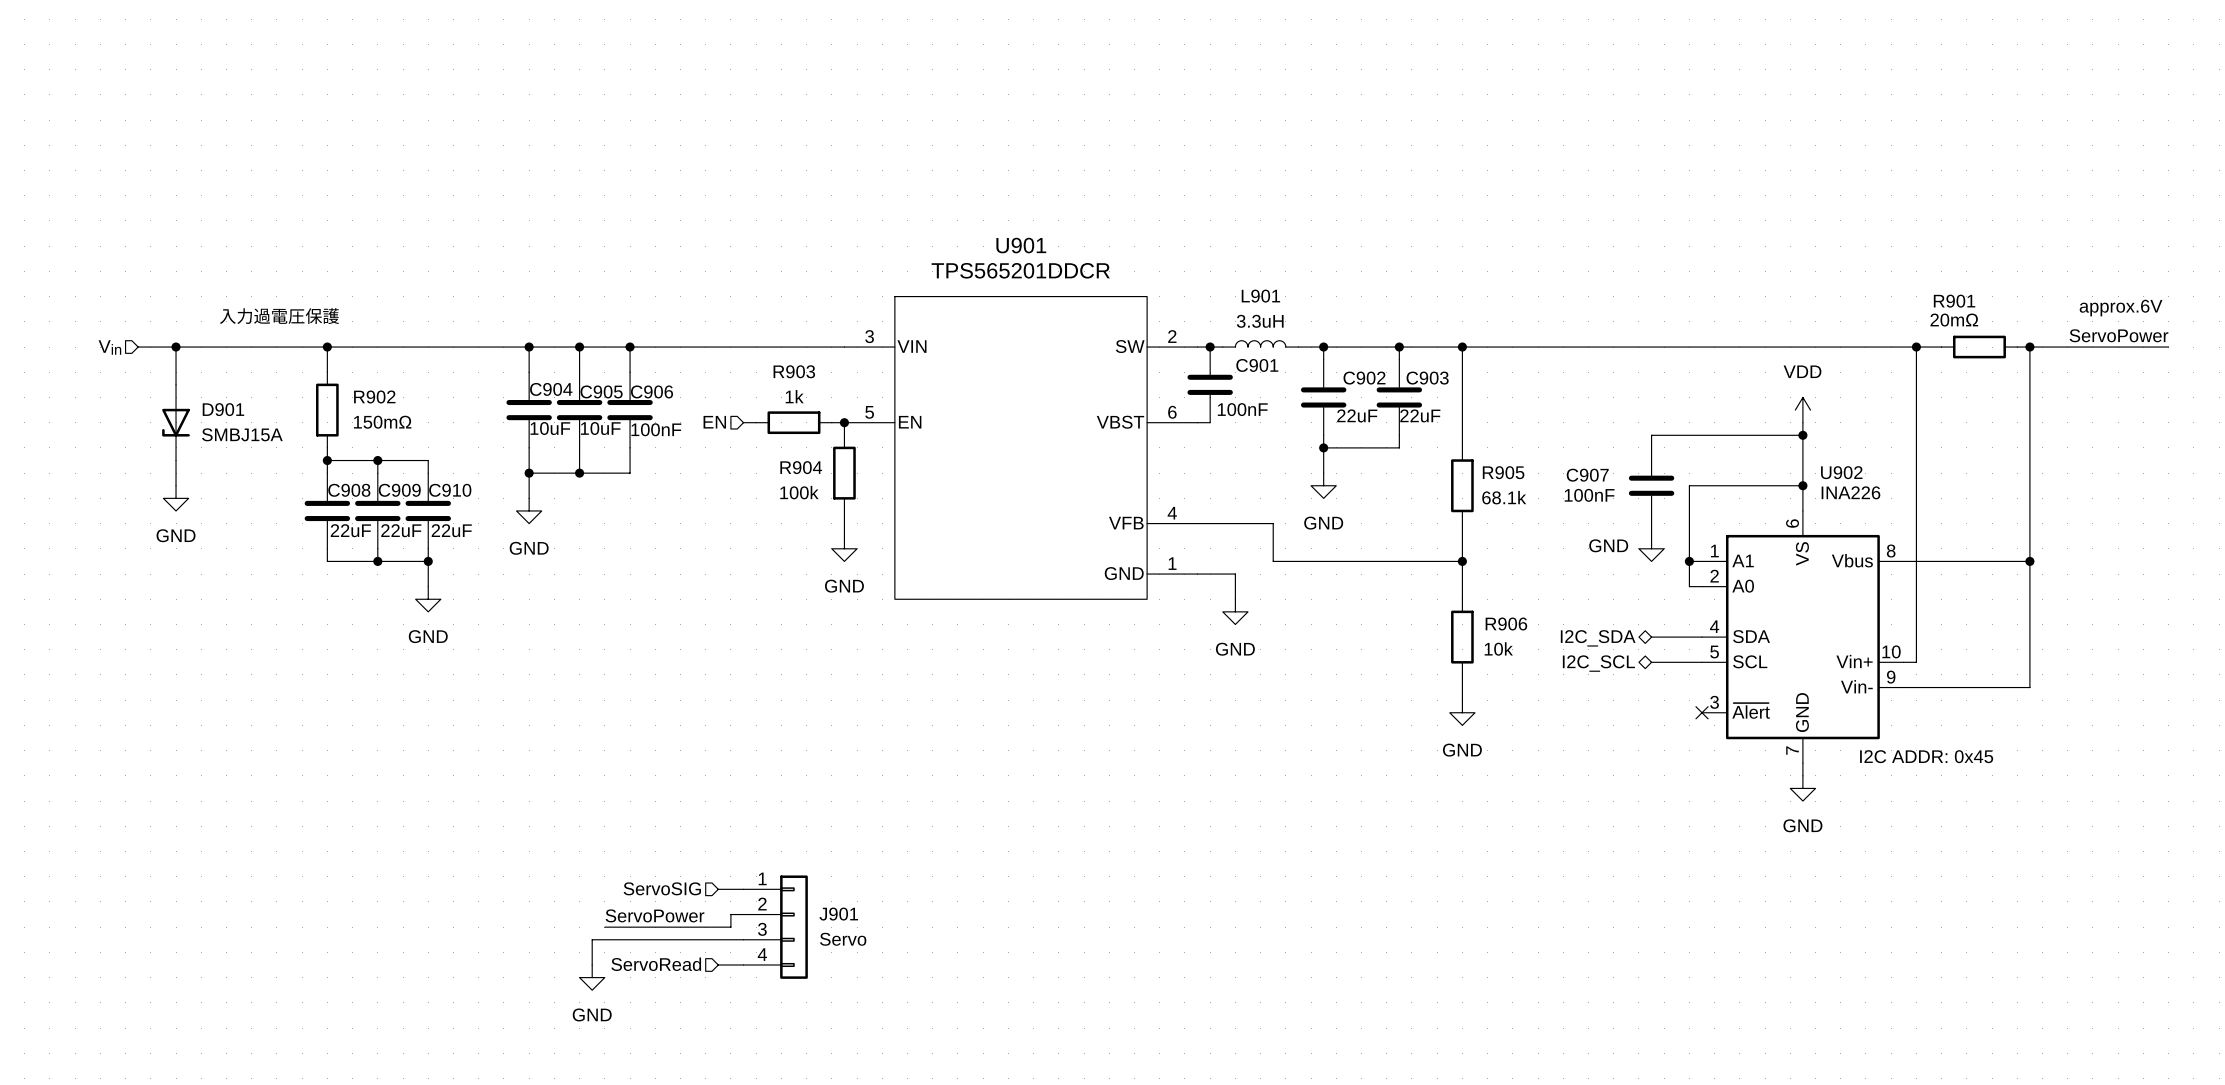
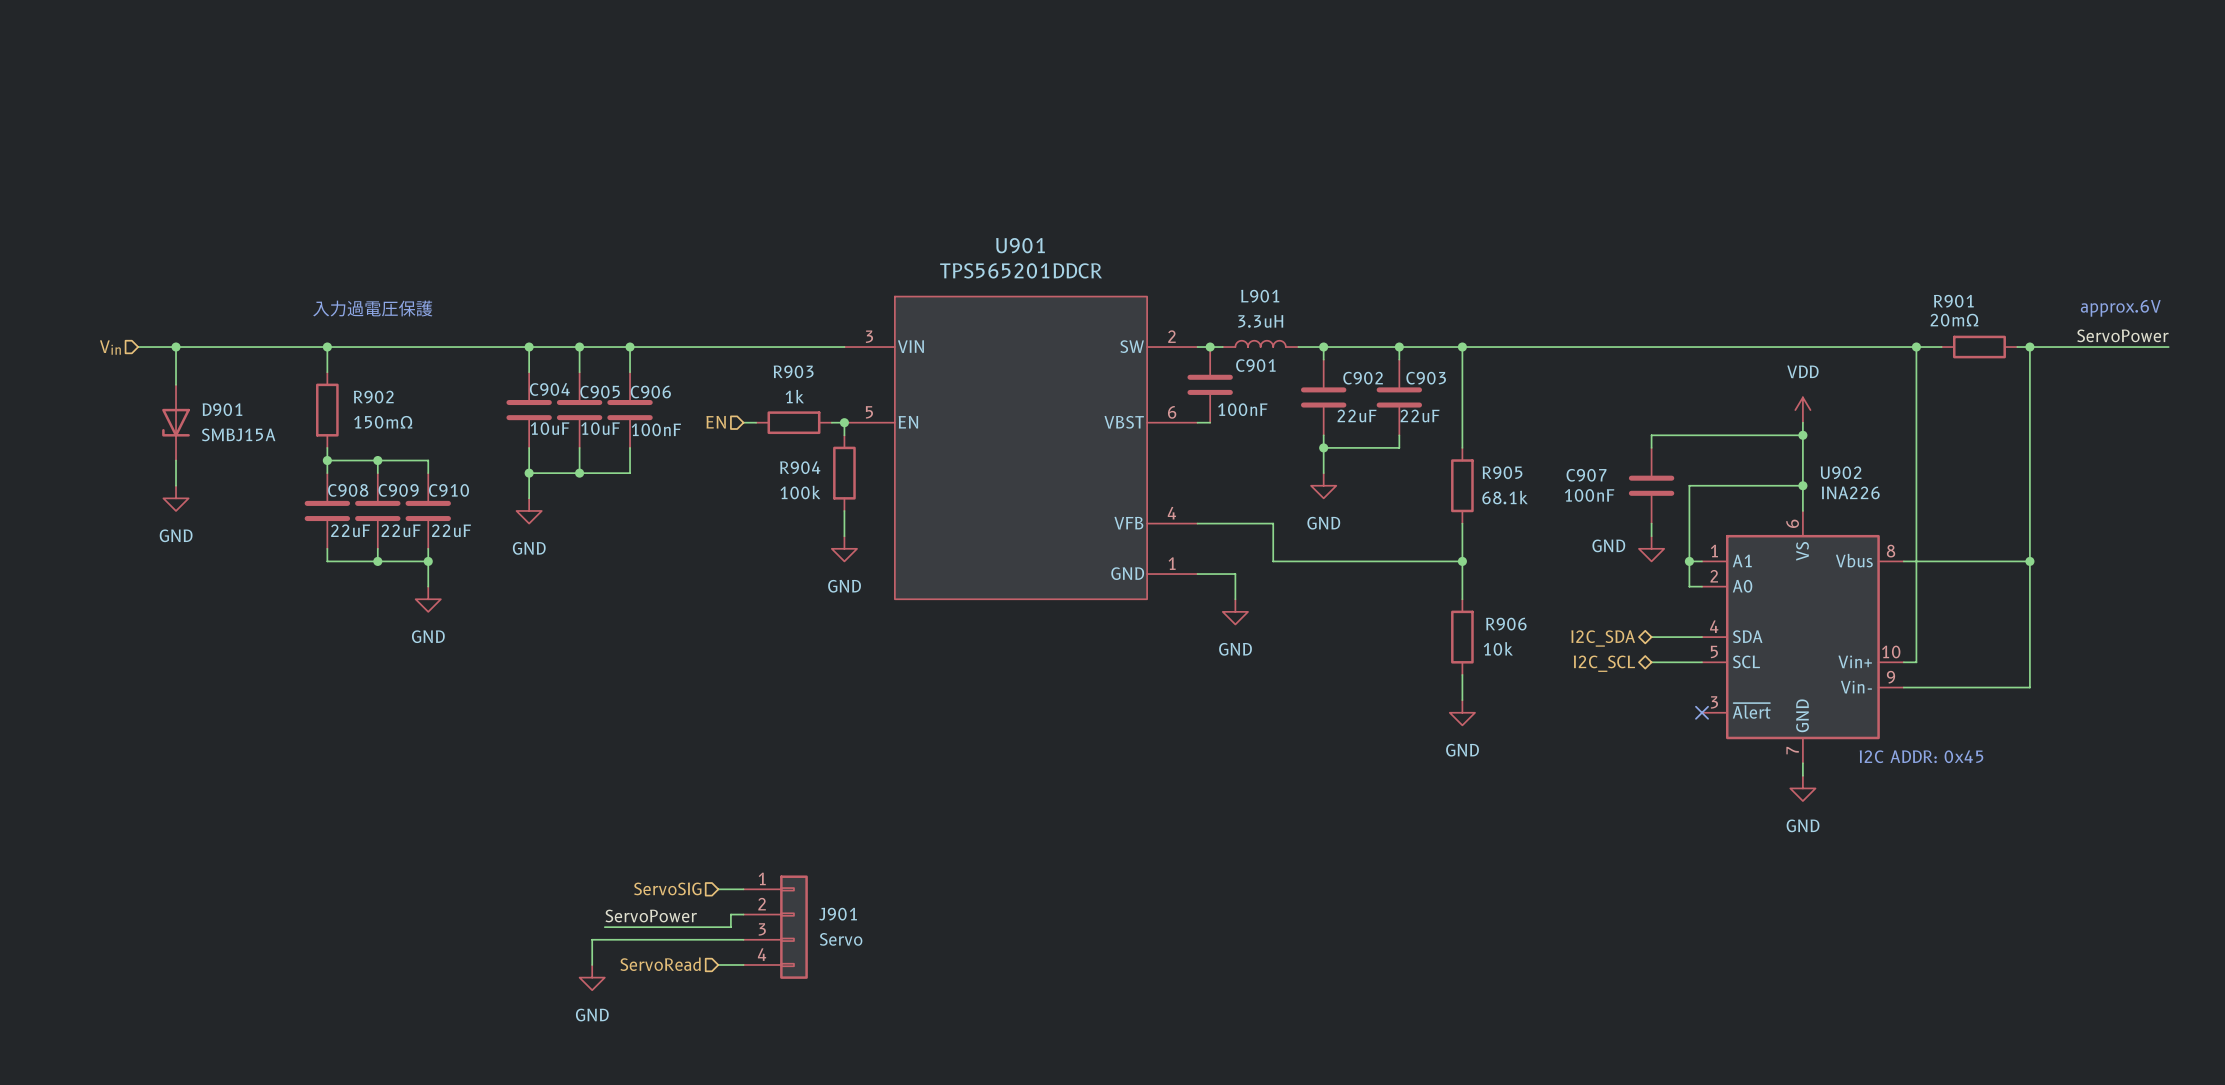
text position: 入力過電圧保護 (279, 316) -> 入力過電圧保護 (372, 308)

